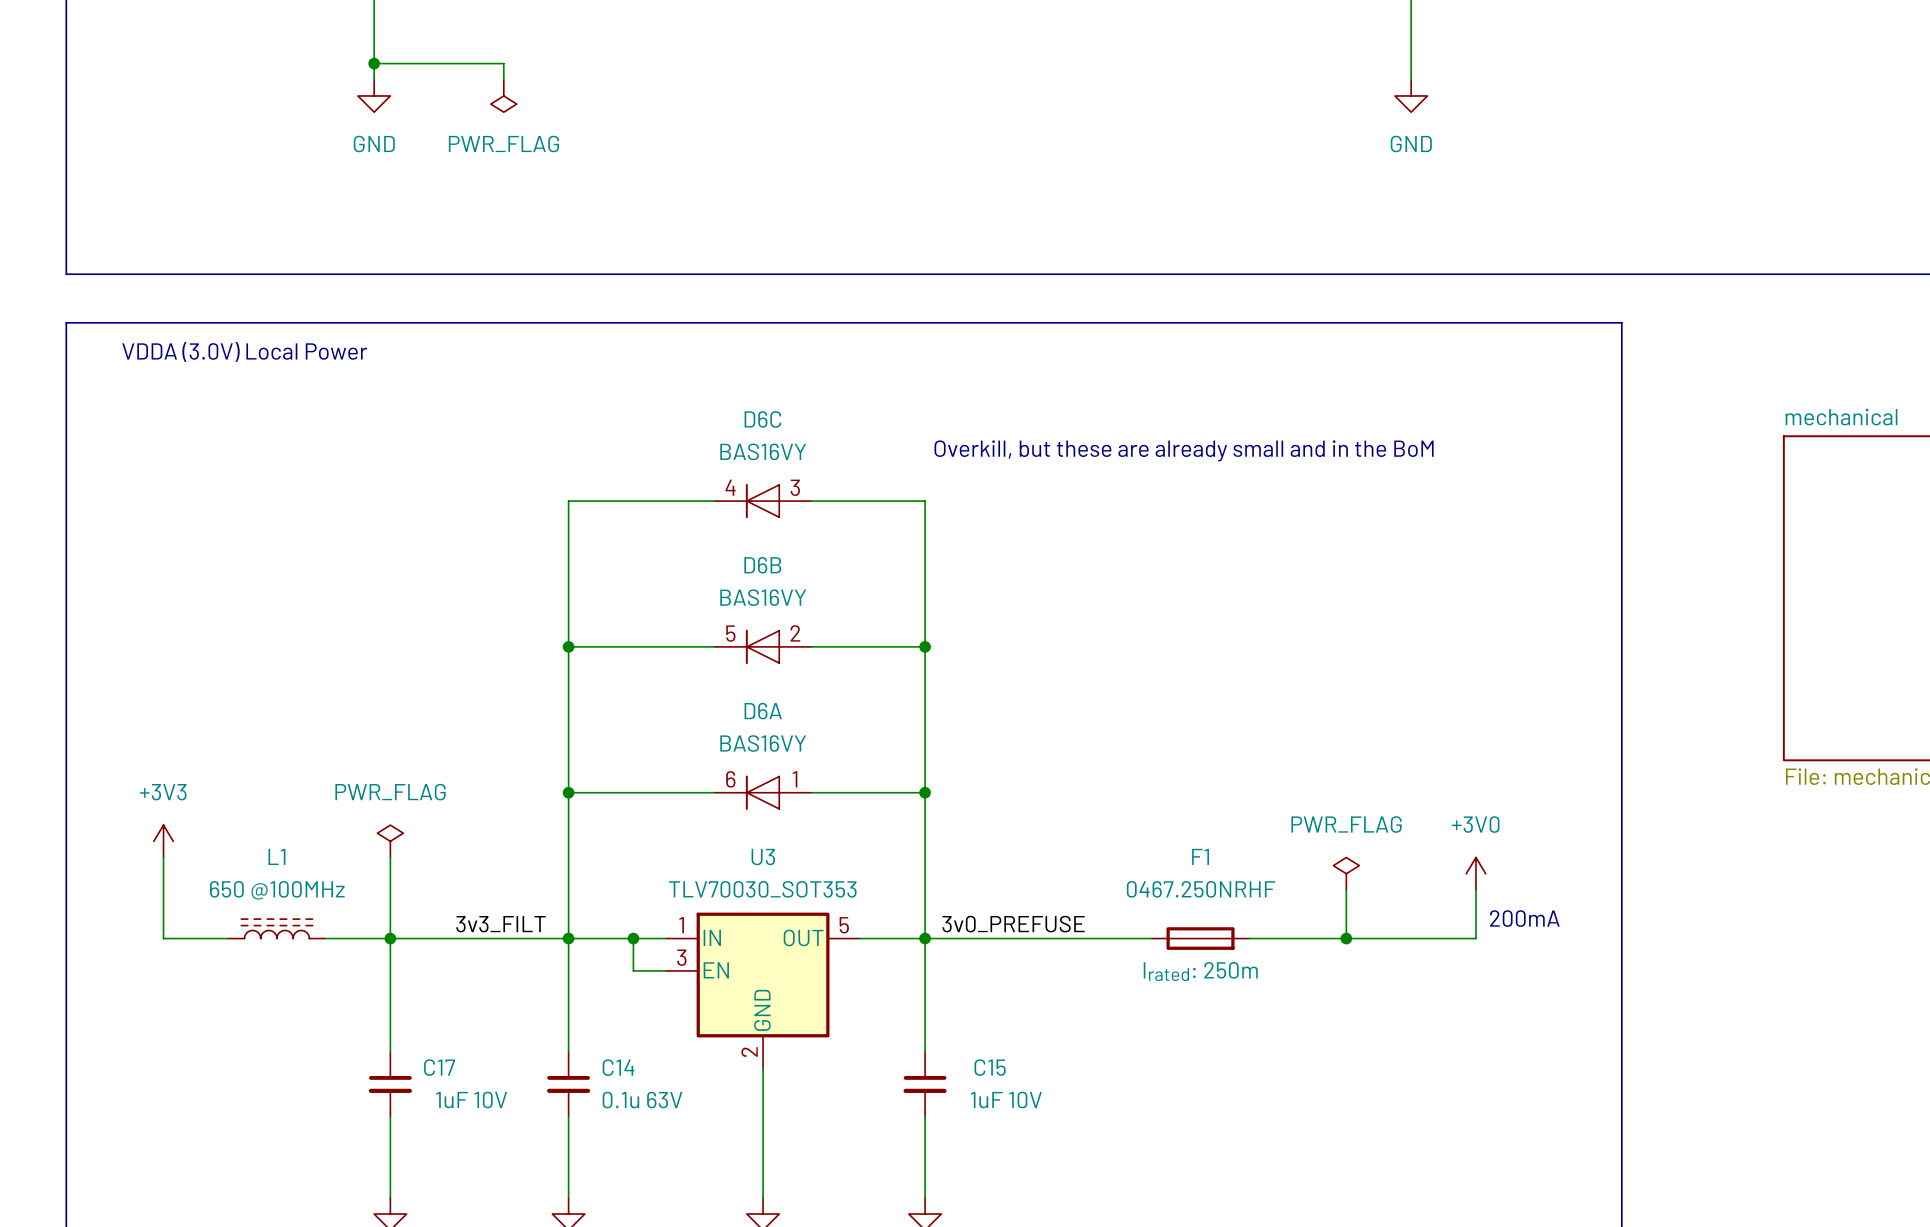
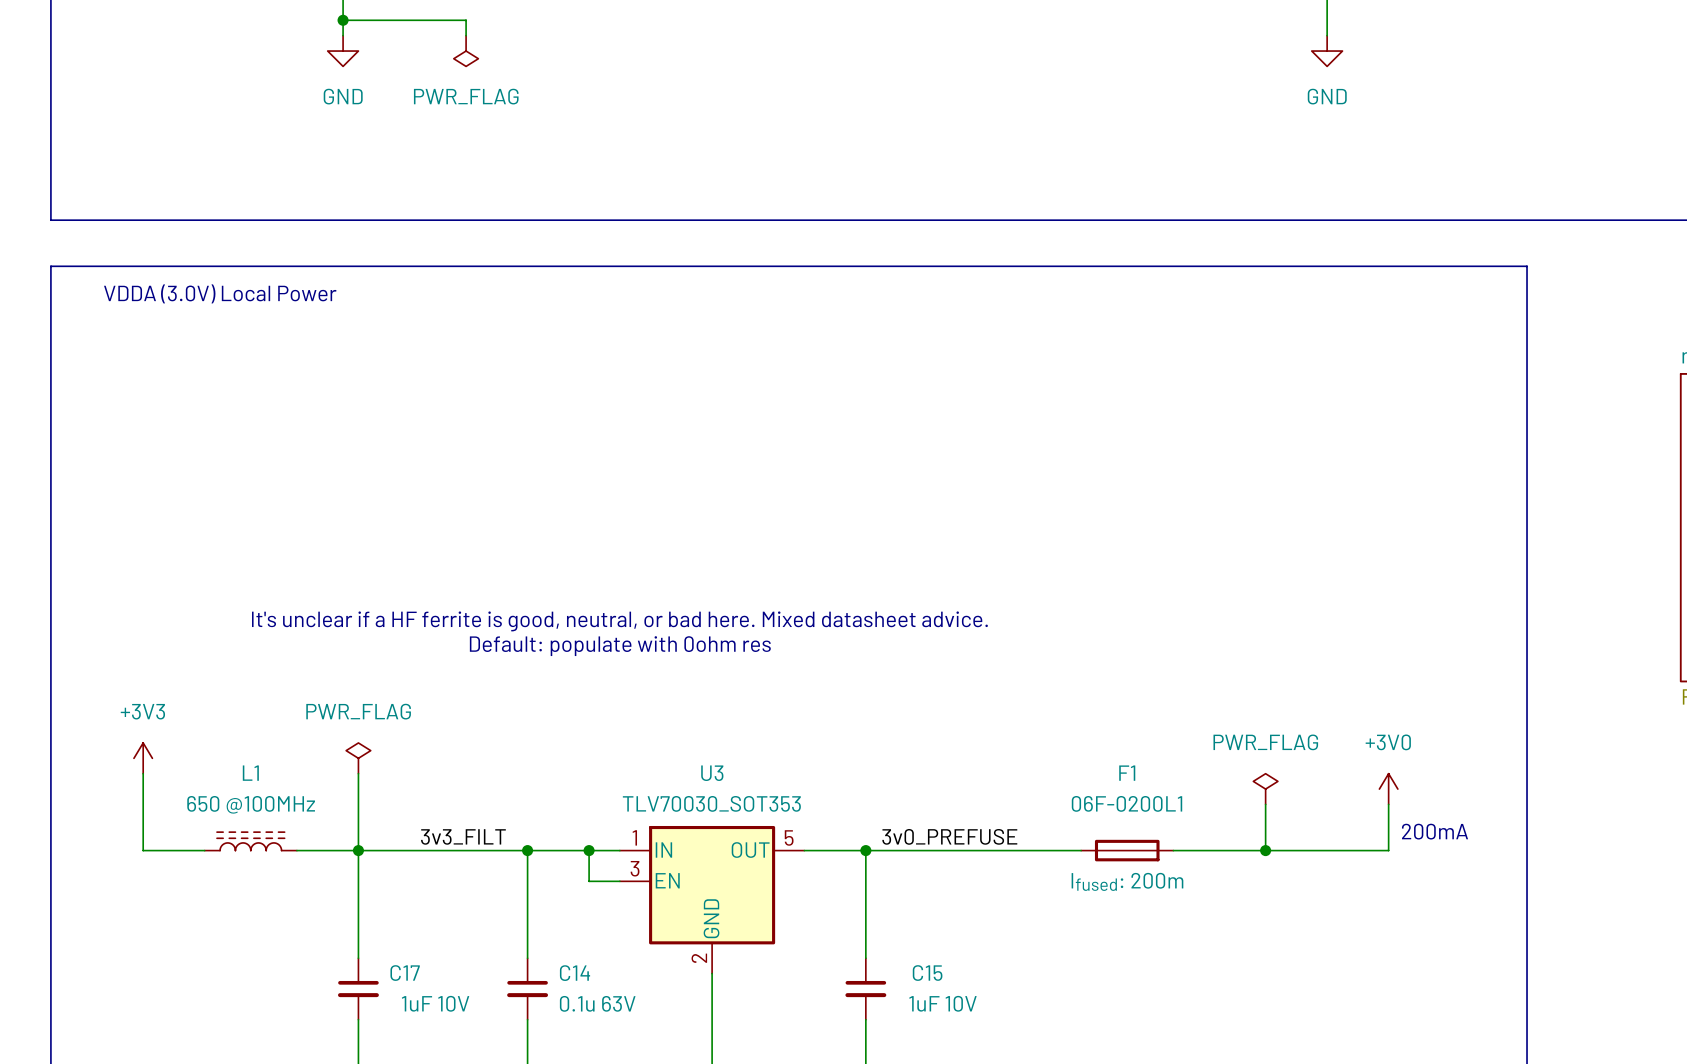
text: Overkill, but these are already small and in the BoM (1184, 450) -> none
wire: (714, 501) (568, 501) (568, 938) -> none
D6C: BAS16VY (763, 501) -> none
wire: (811, 501) (925, 501) (925, 938) -> none
wire: (568, 646) (714, 646) -> none
junction: (568, 646) -> none
D6B: BAS16VY (763, 646) -> none
wire: (811, 646) (925, 646) -> none
junction: (925, 646) -> none
text: none -> It's unclear if a HF ferrite is good, neutral, or bad here. Mixed datasheet advice. (619, 621)
text: none -> Default: populate with 0ohm res (620, 646)
wire: (568, 792) (714, 792) -> none
junction: (568, 792) -> none
D6A: BAS16VY (763, 792) -> none
wire: (811, 792) (925, 792) -> none
junction: (925, 792) -> none
F1 value: 0467.250NRHF (1201, 889) -> 06F-0200L1 (1127, 803)
F1 text: none -> Ifused: 200m (1127, 881)
F1 text: Irated: 250m (1200, 971) -> none

